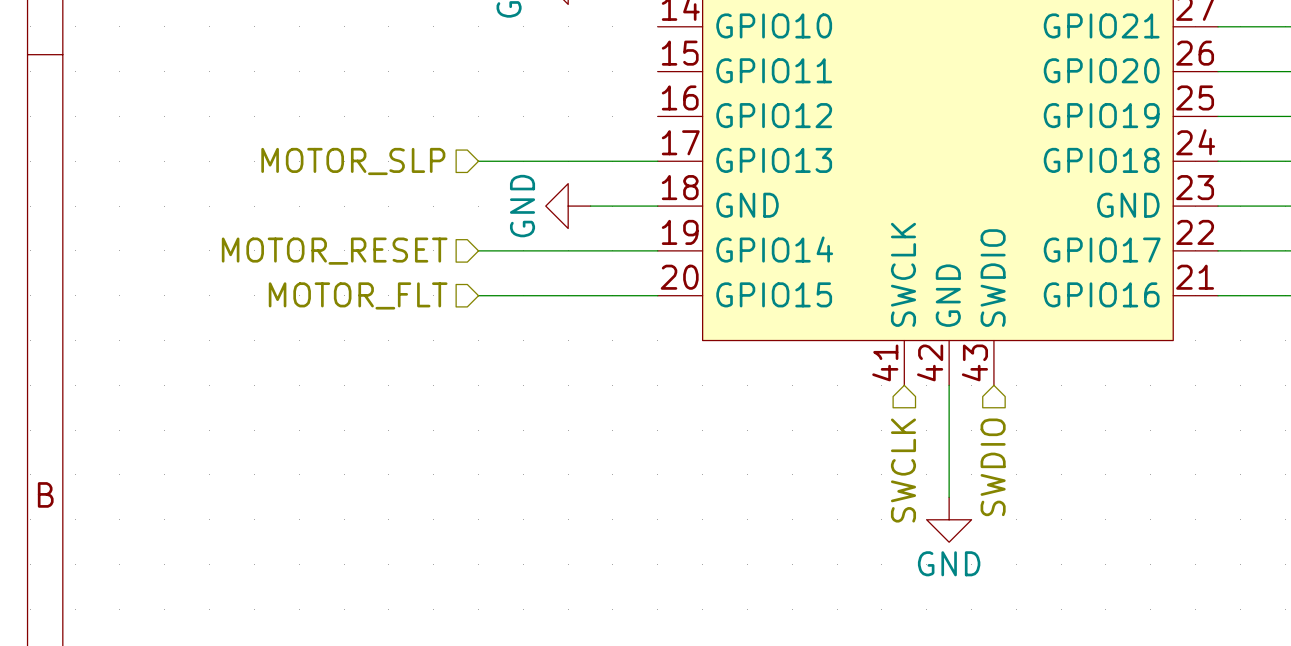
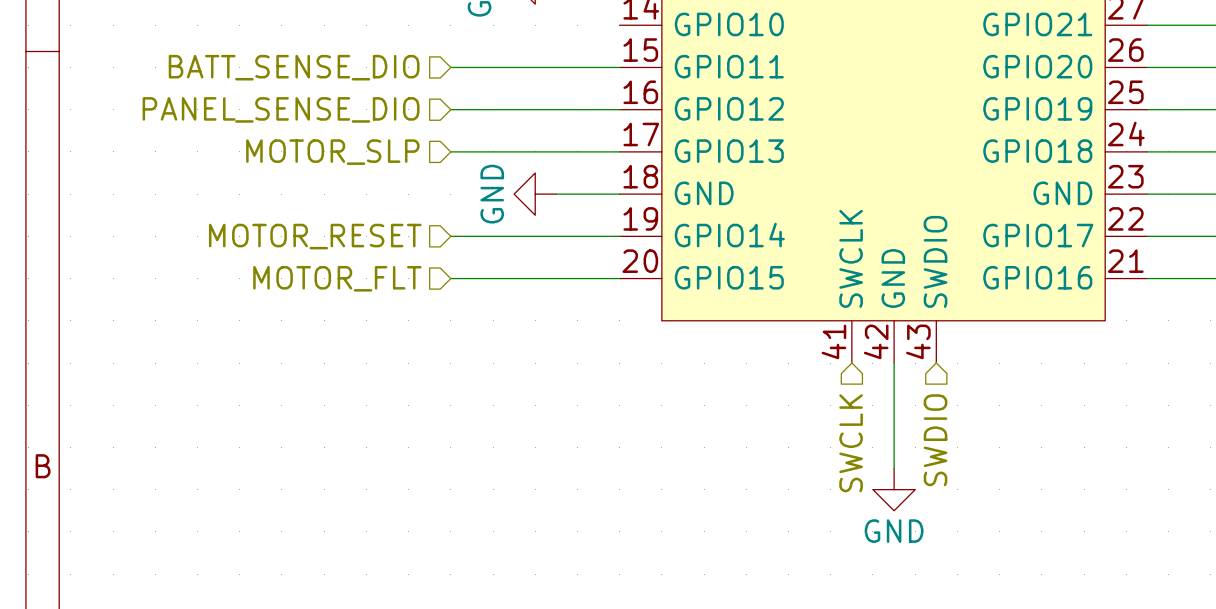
hierarchical label: none -> BATT_SENSE_DIO (294, 67)
wire: none -> (450, 67) (619, 67)
hierarchical label: none -> PANEL_SENSE_DIO (281, 109)
wire: none -> (450, 109) (619, 109)

